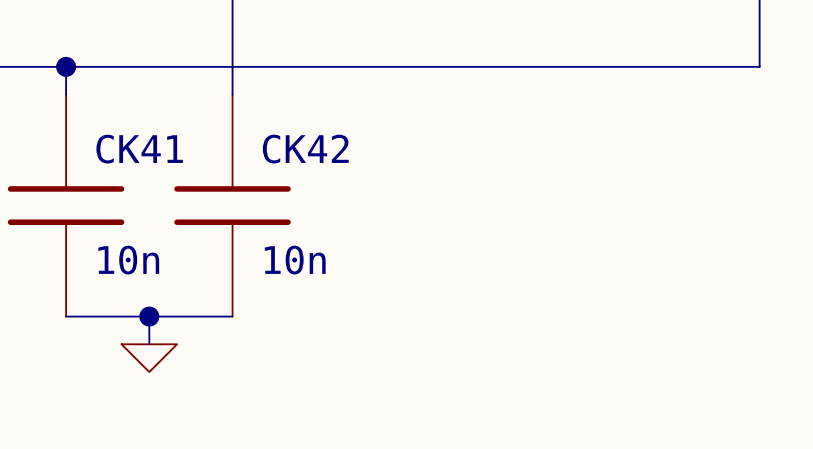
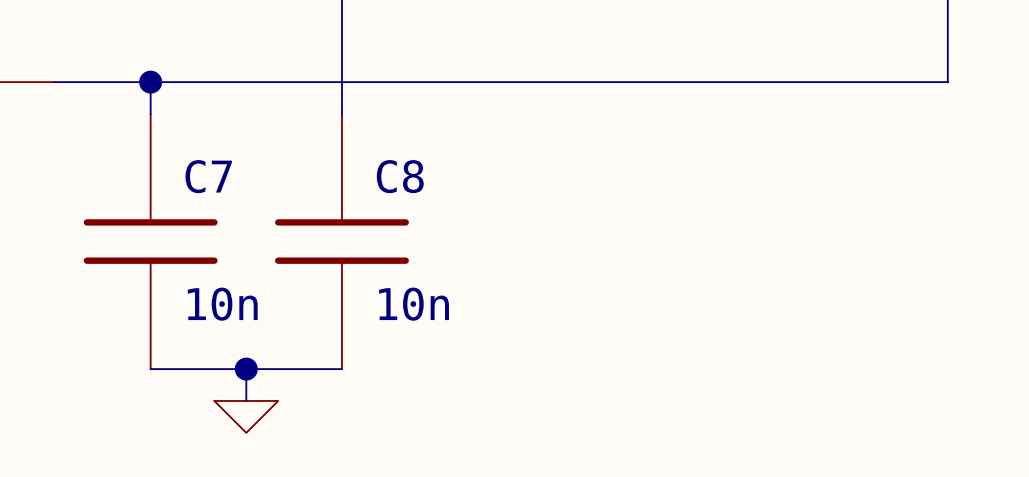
CK41 name: CK41 (139, 149) -> C7 (208, 176)
CK42 name: CK42 (305, 149) -> C8 (400, 176)

